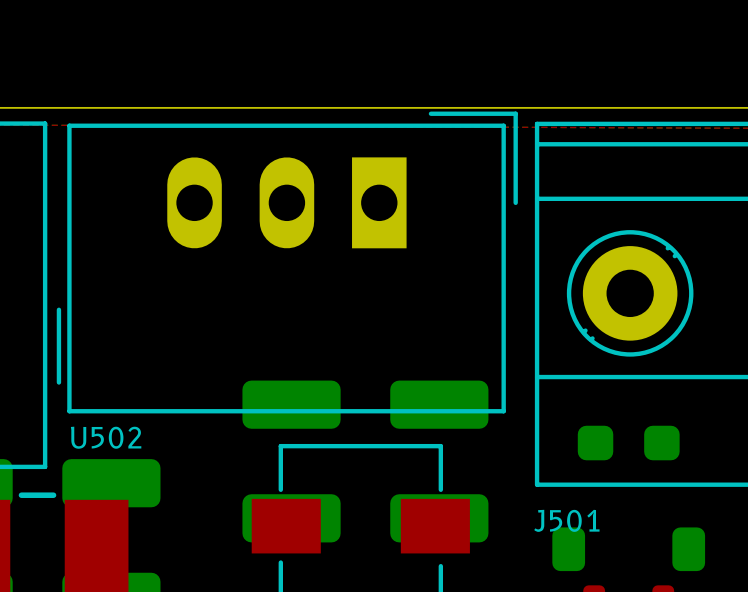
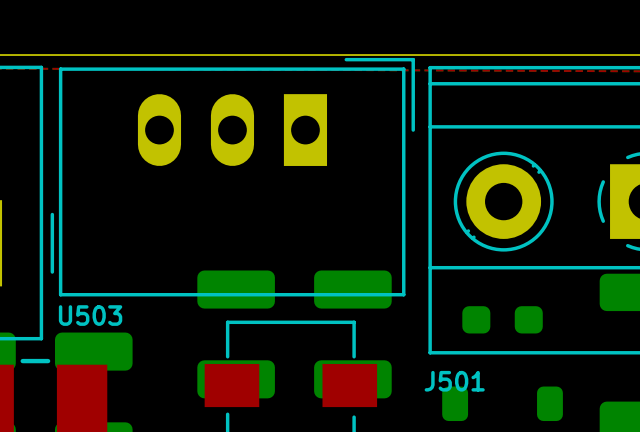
U502 name: U502 (106, 437) -> U503 (90, 315)

